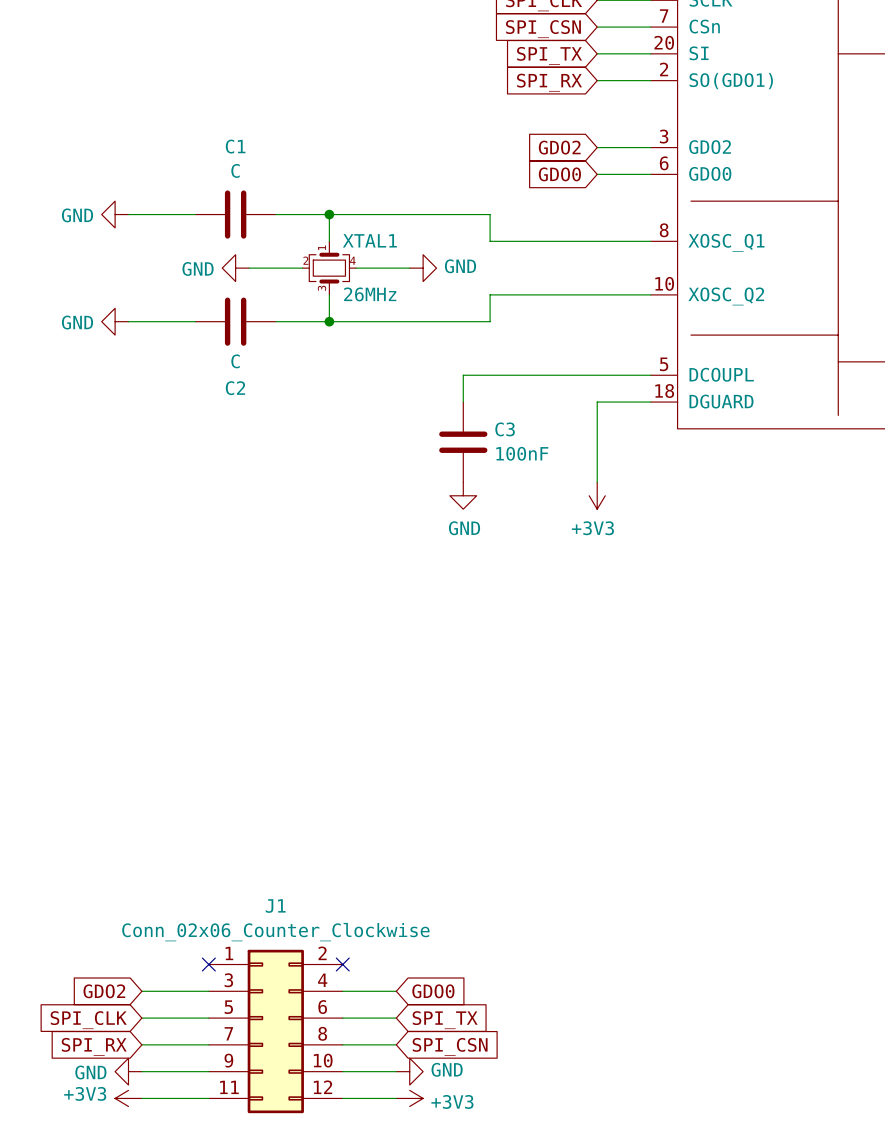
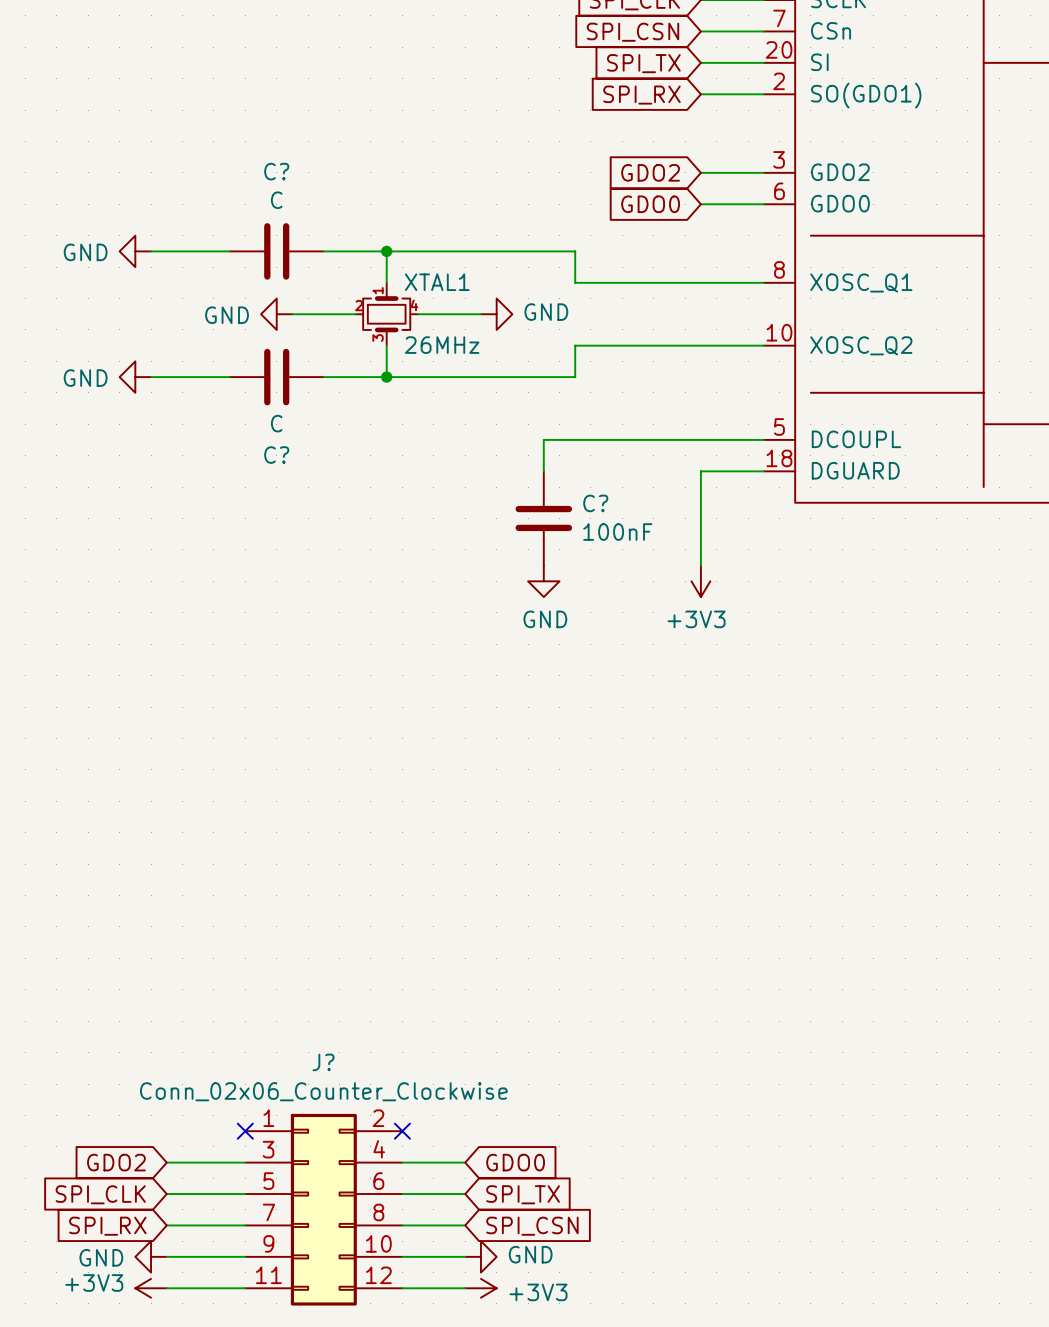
C1 name: C1 (235, 146) -> C? (276, 171)
C2 name: C2 (235, 388) -> C? (276, 455)
C3 name: C3 (505, 429) -> C? (595, 503)
J1 name: J1 (275, 906) -> J? (323, 1062)

